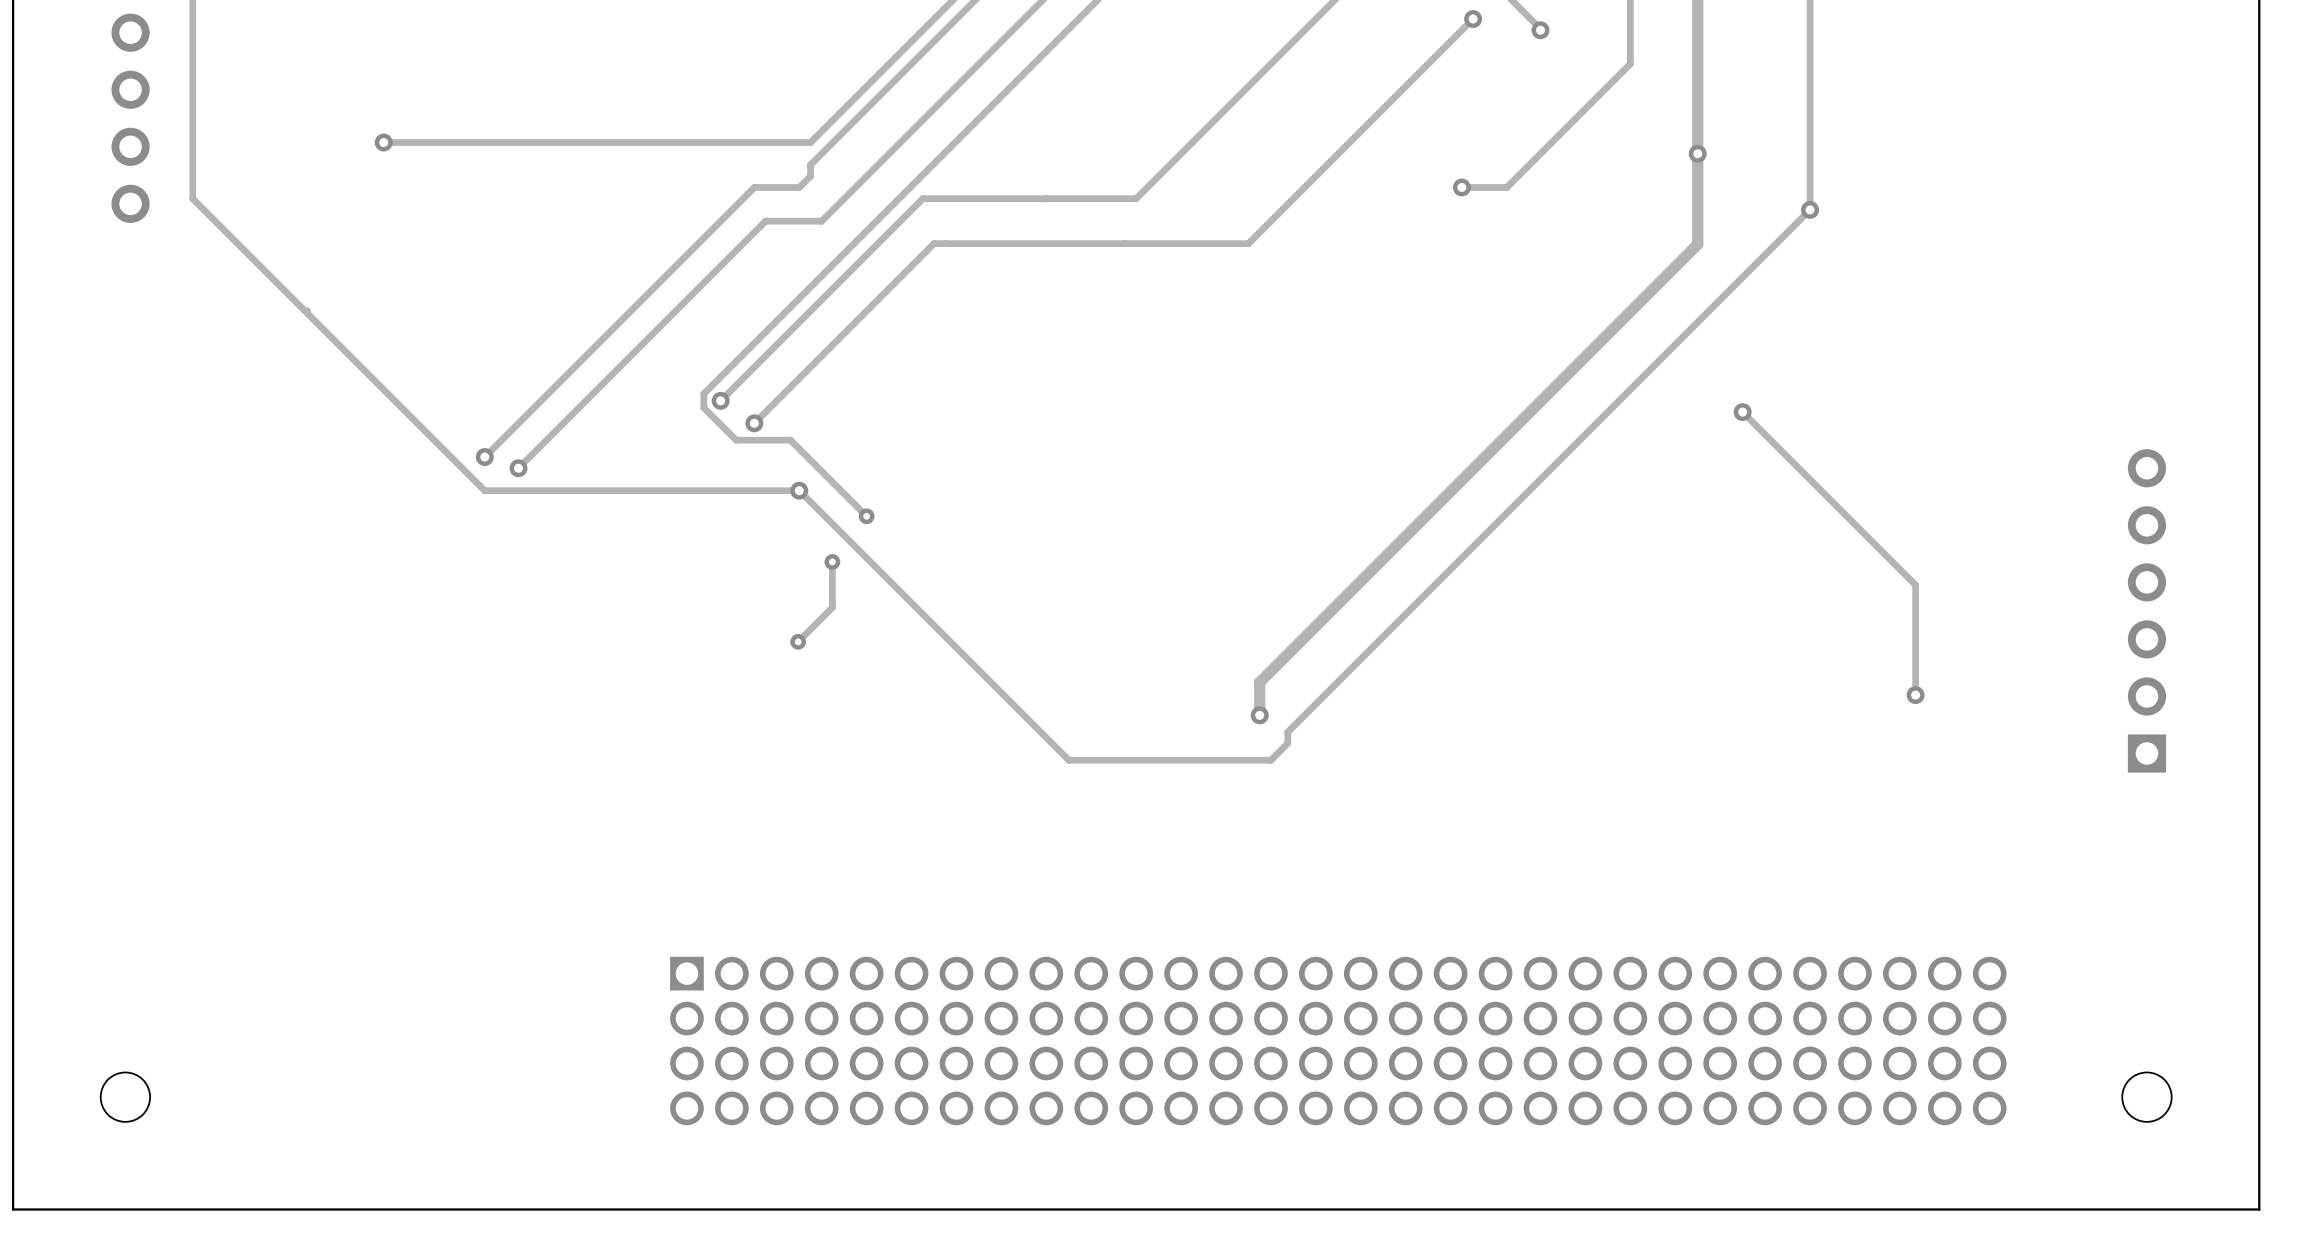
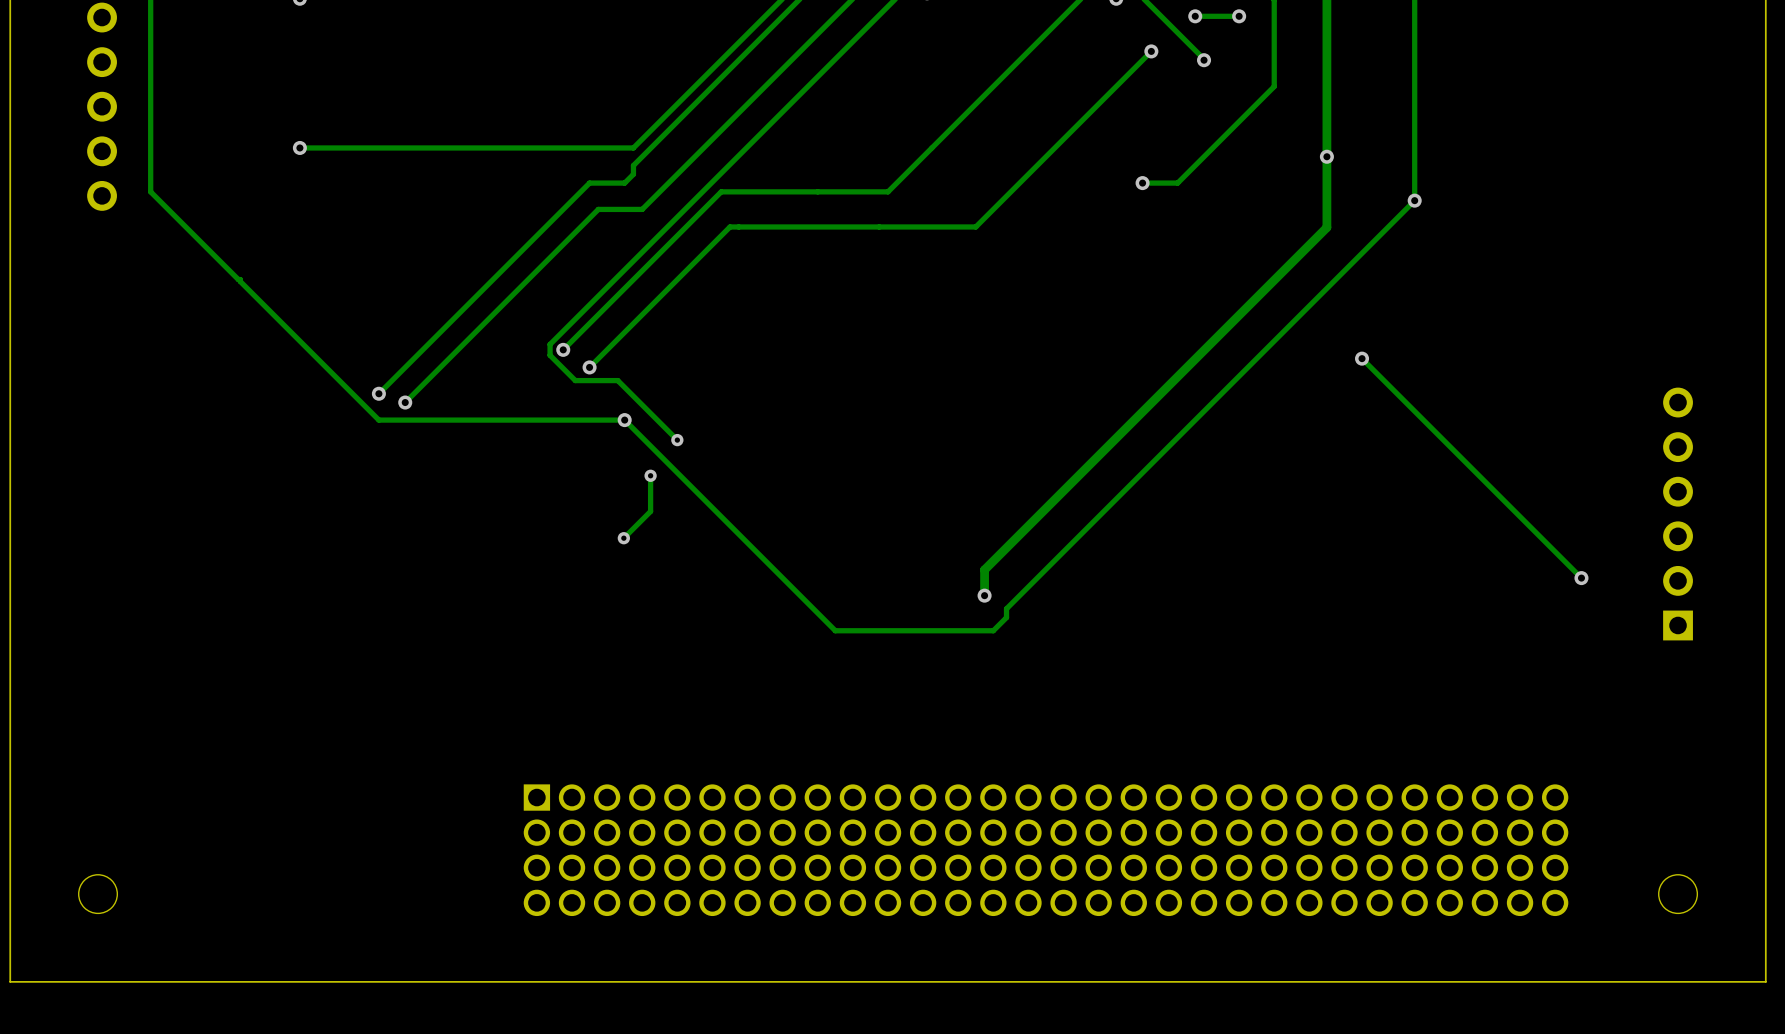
track: (1915, 585) (1915, 695) -> (1497, 493) (1581, 578)
via position: (1915, 695) -> (1581, 578)

